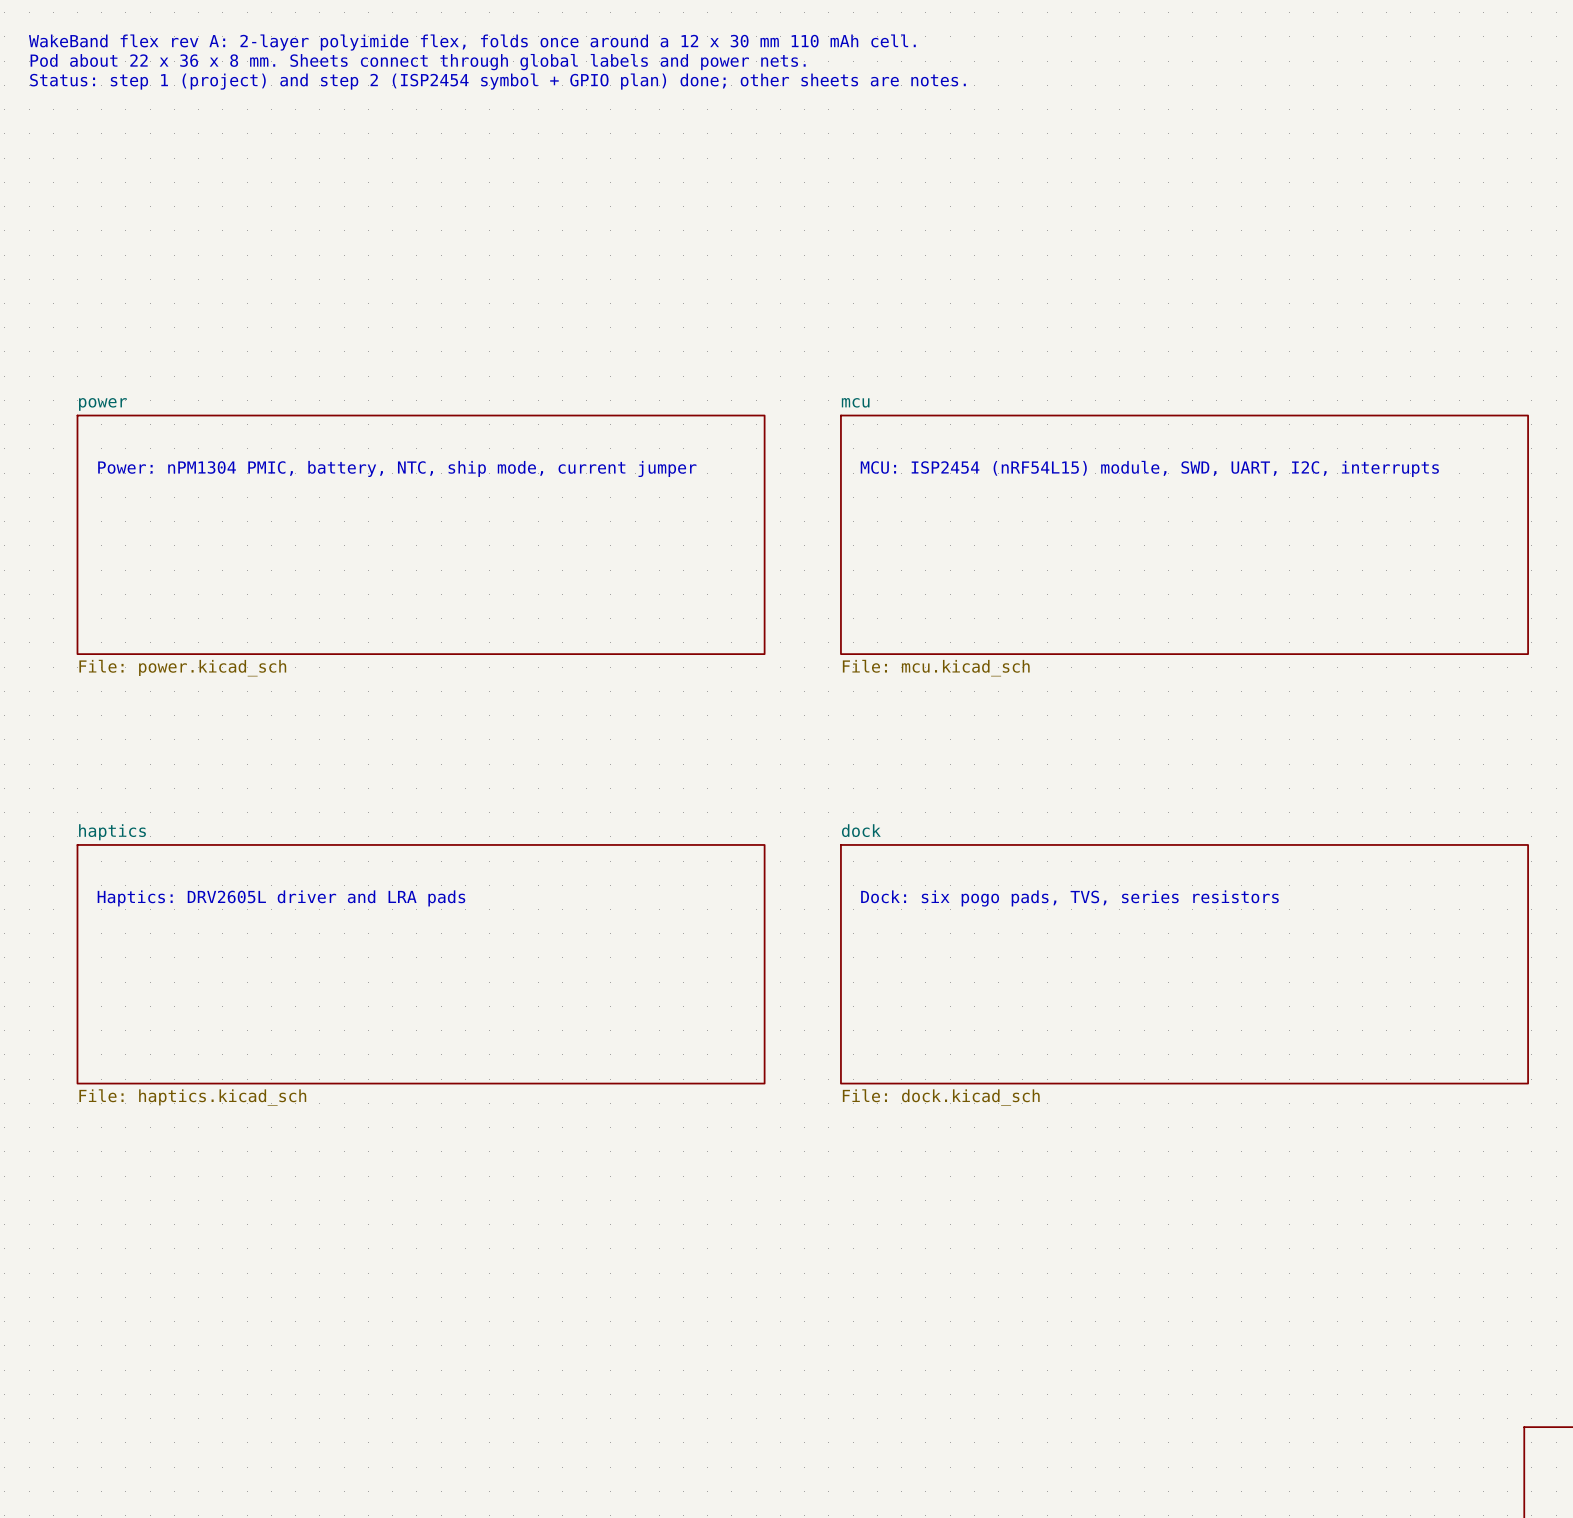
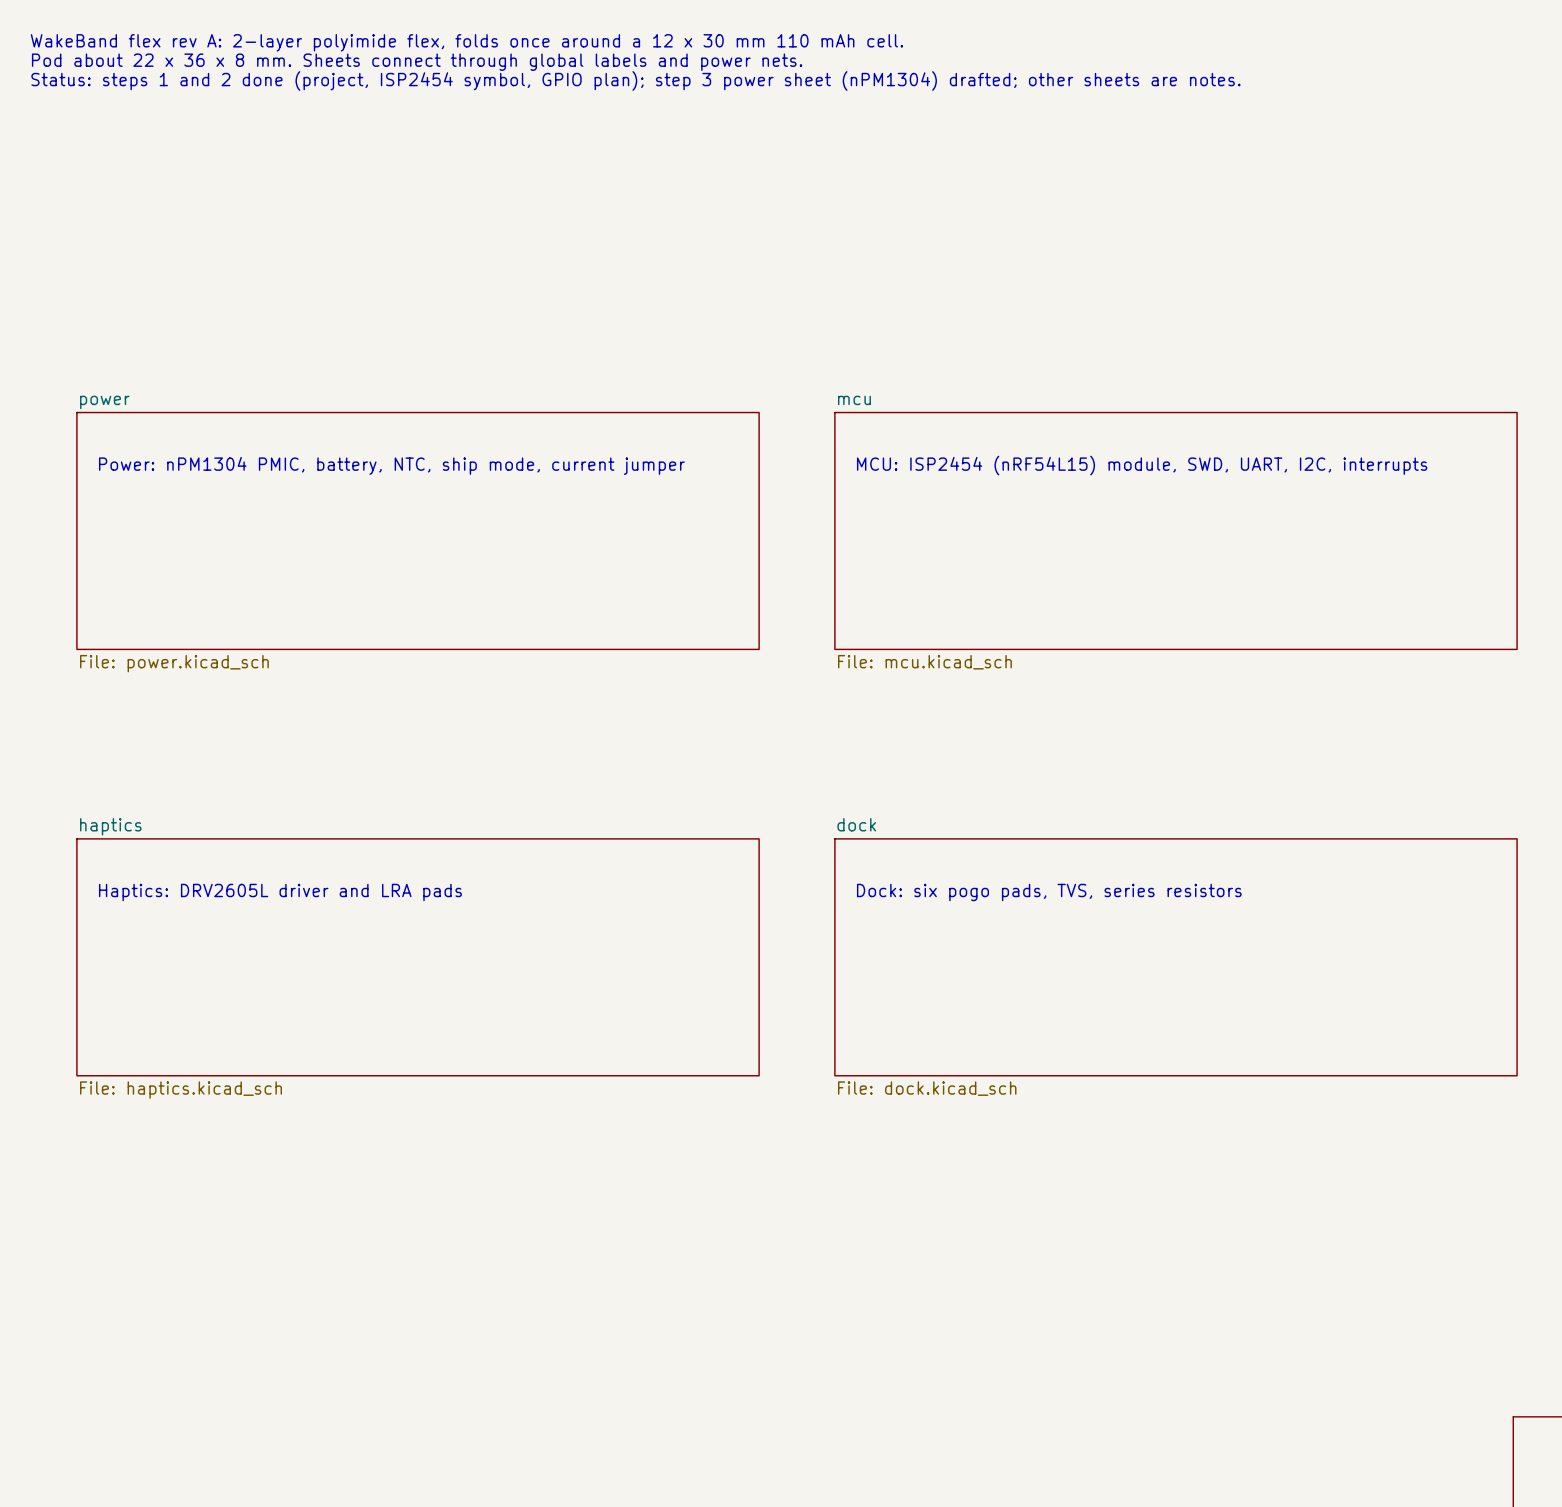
text: Status: step 1 (project) and step 2 (ISP2454 symbol + GPIO plan) done; other sheets are notes. (497, 81) -> Status: steps 1 and 2 done (project, ISP2454 symbol, GPIO plan); step 3 power sheet (nPM1304) drafted; other sheets are notes. (635, 80)

